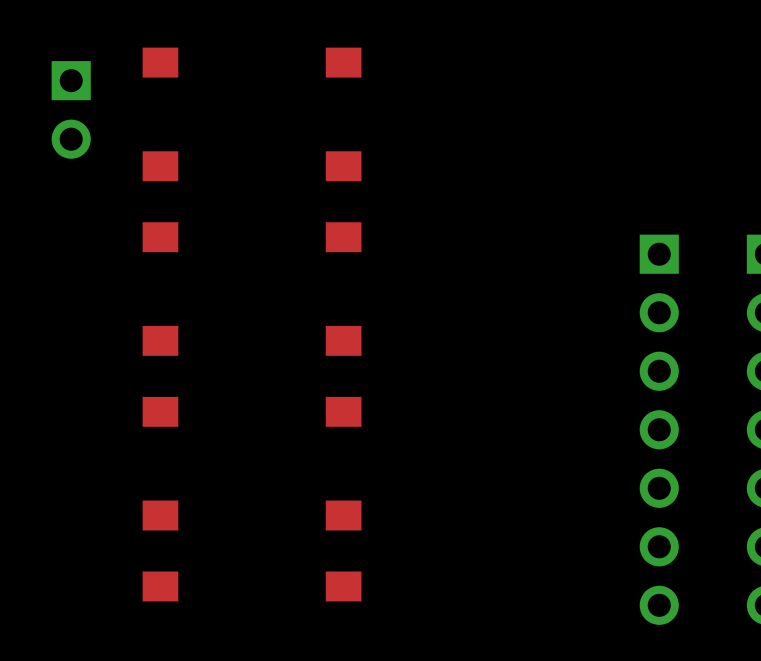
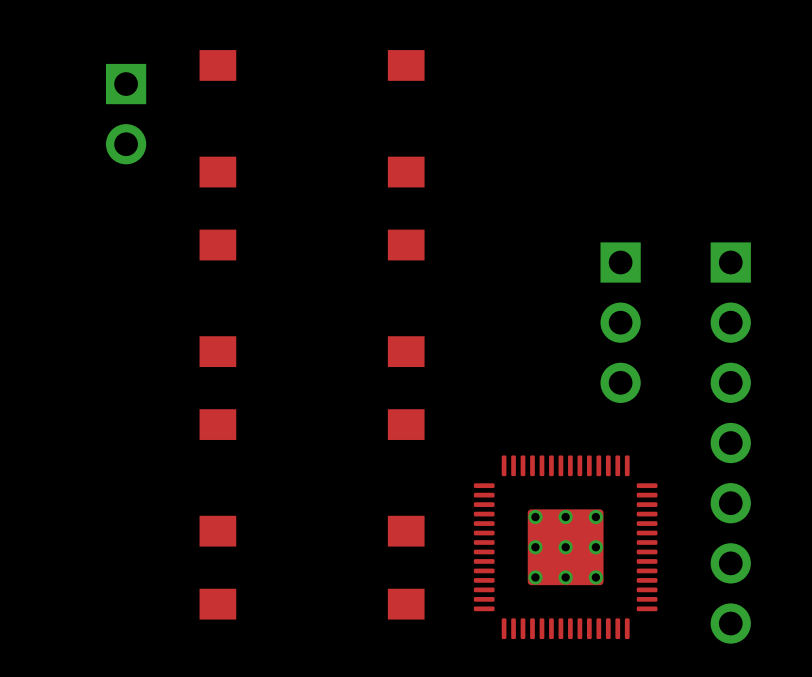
part: none -> (620, 322)
part: none -> (565, 547)

